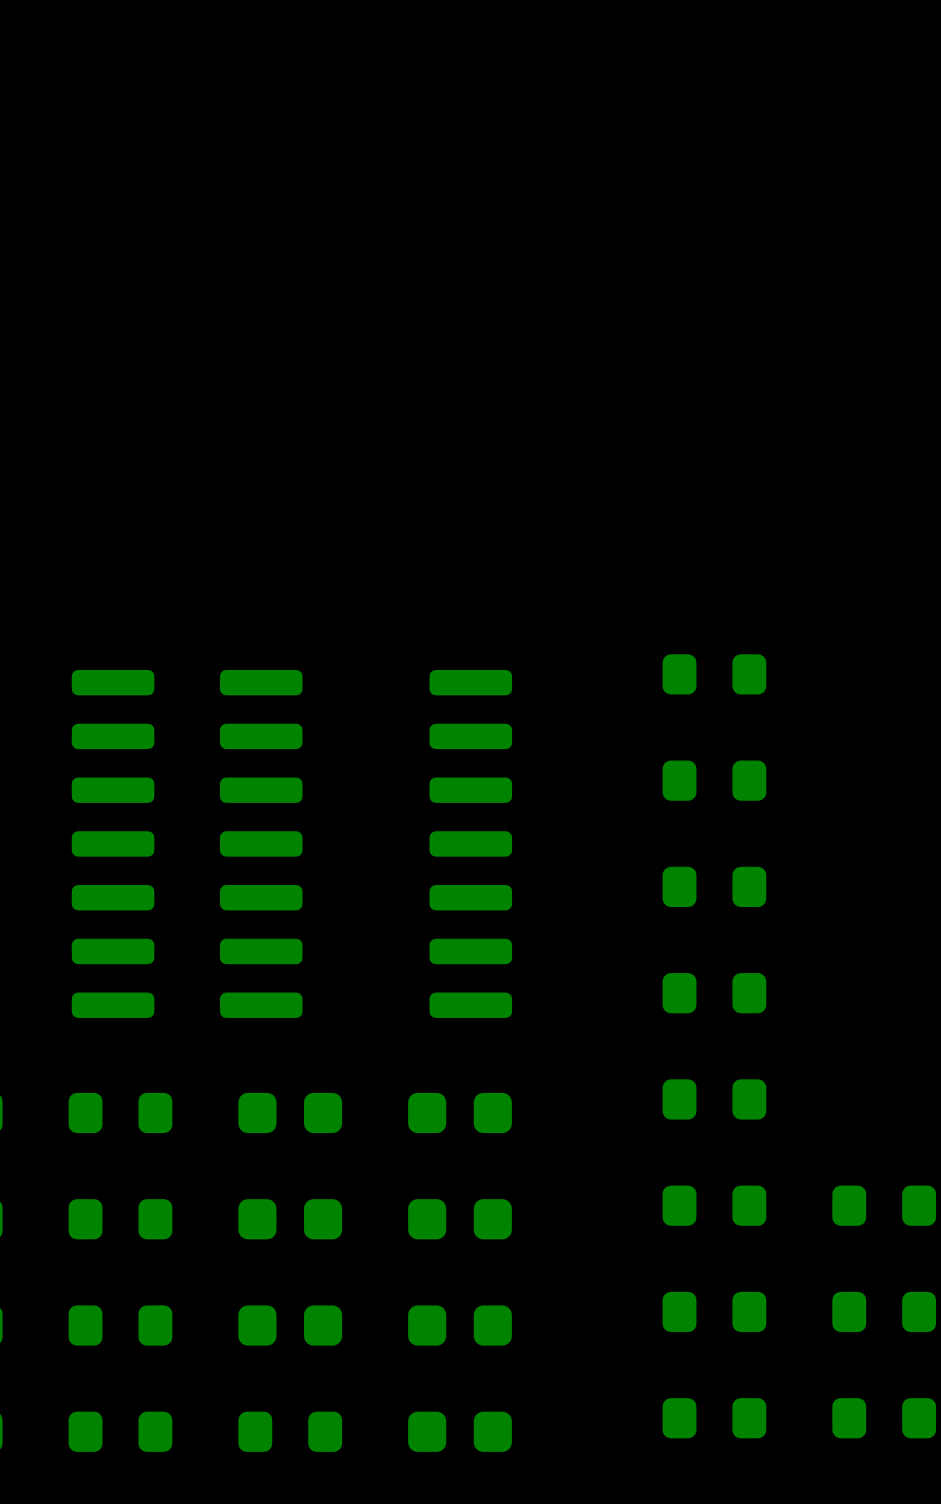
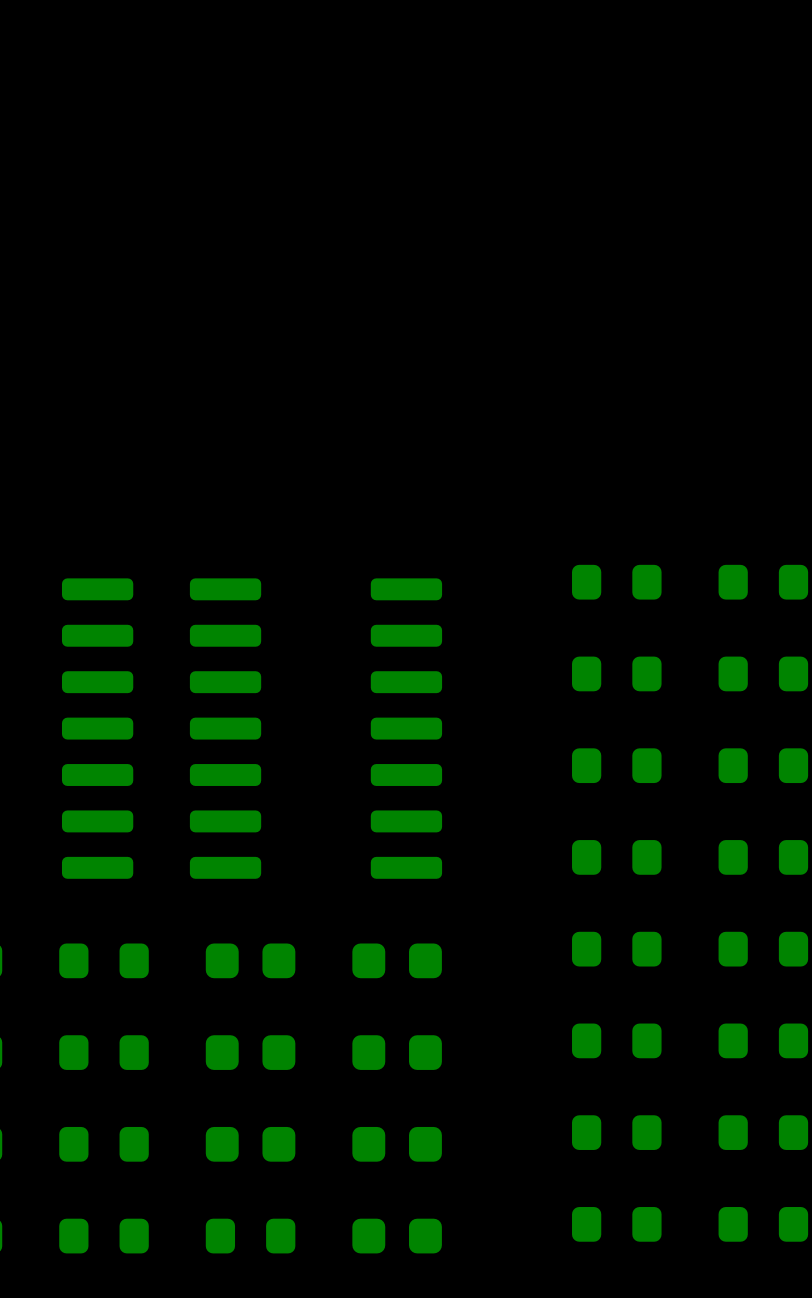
part: none -> (763, 582)
part: none -> (763, 673)
part: none -> (763, 765)
part: none -> (763, 857)
part: none -> (763, 949)

